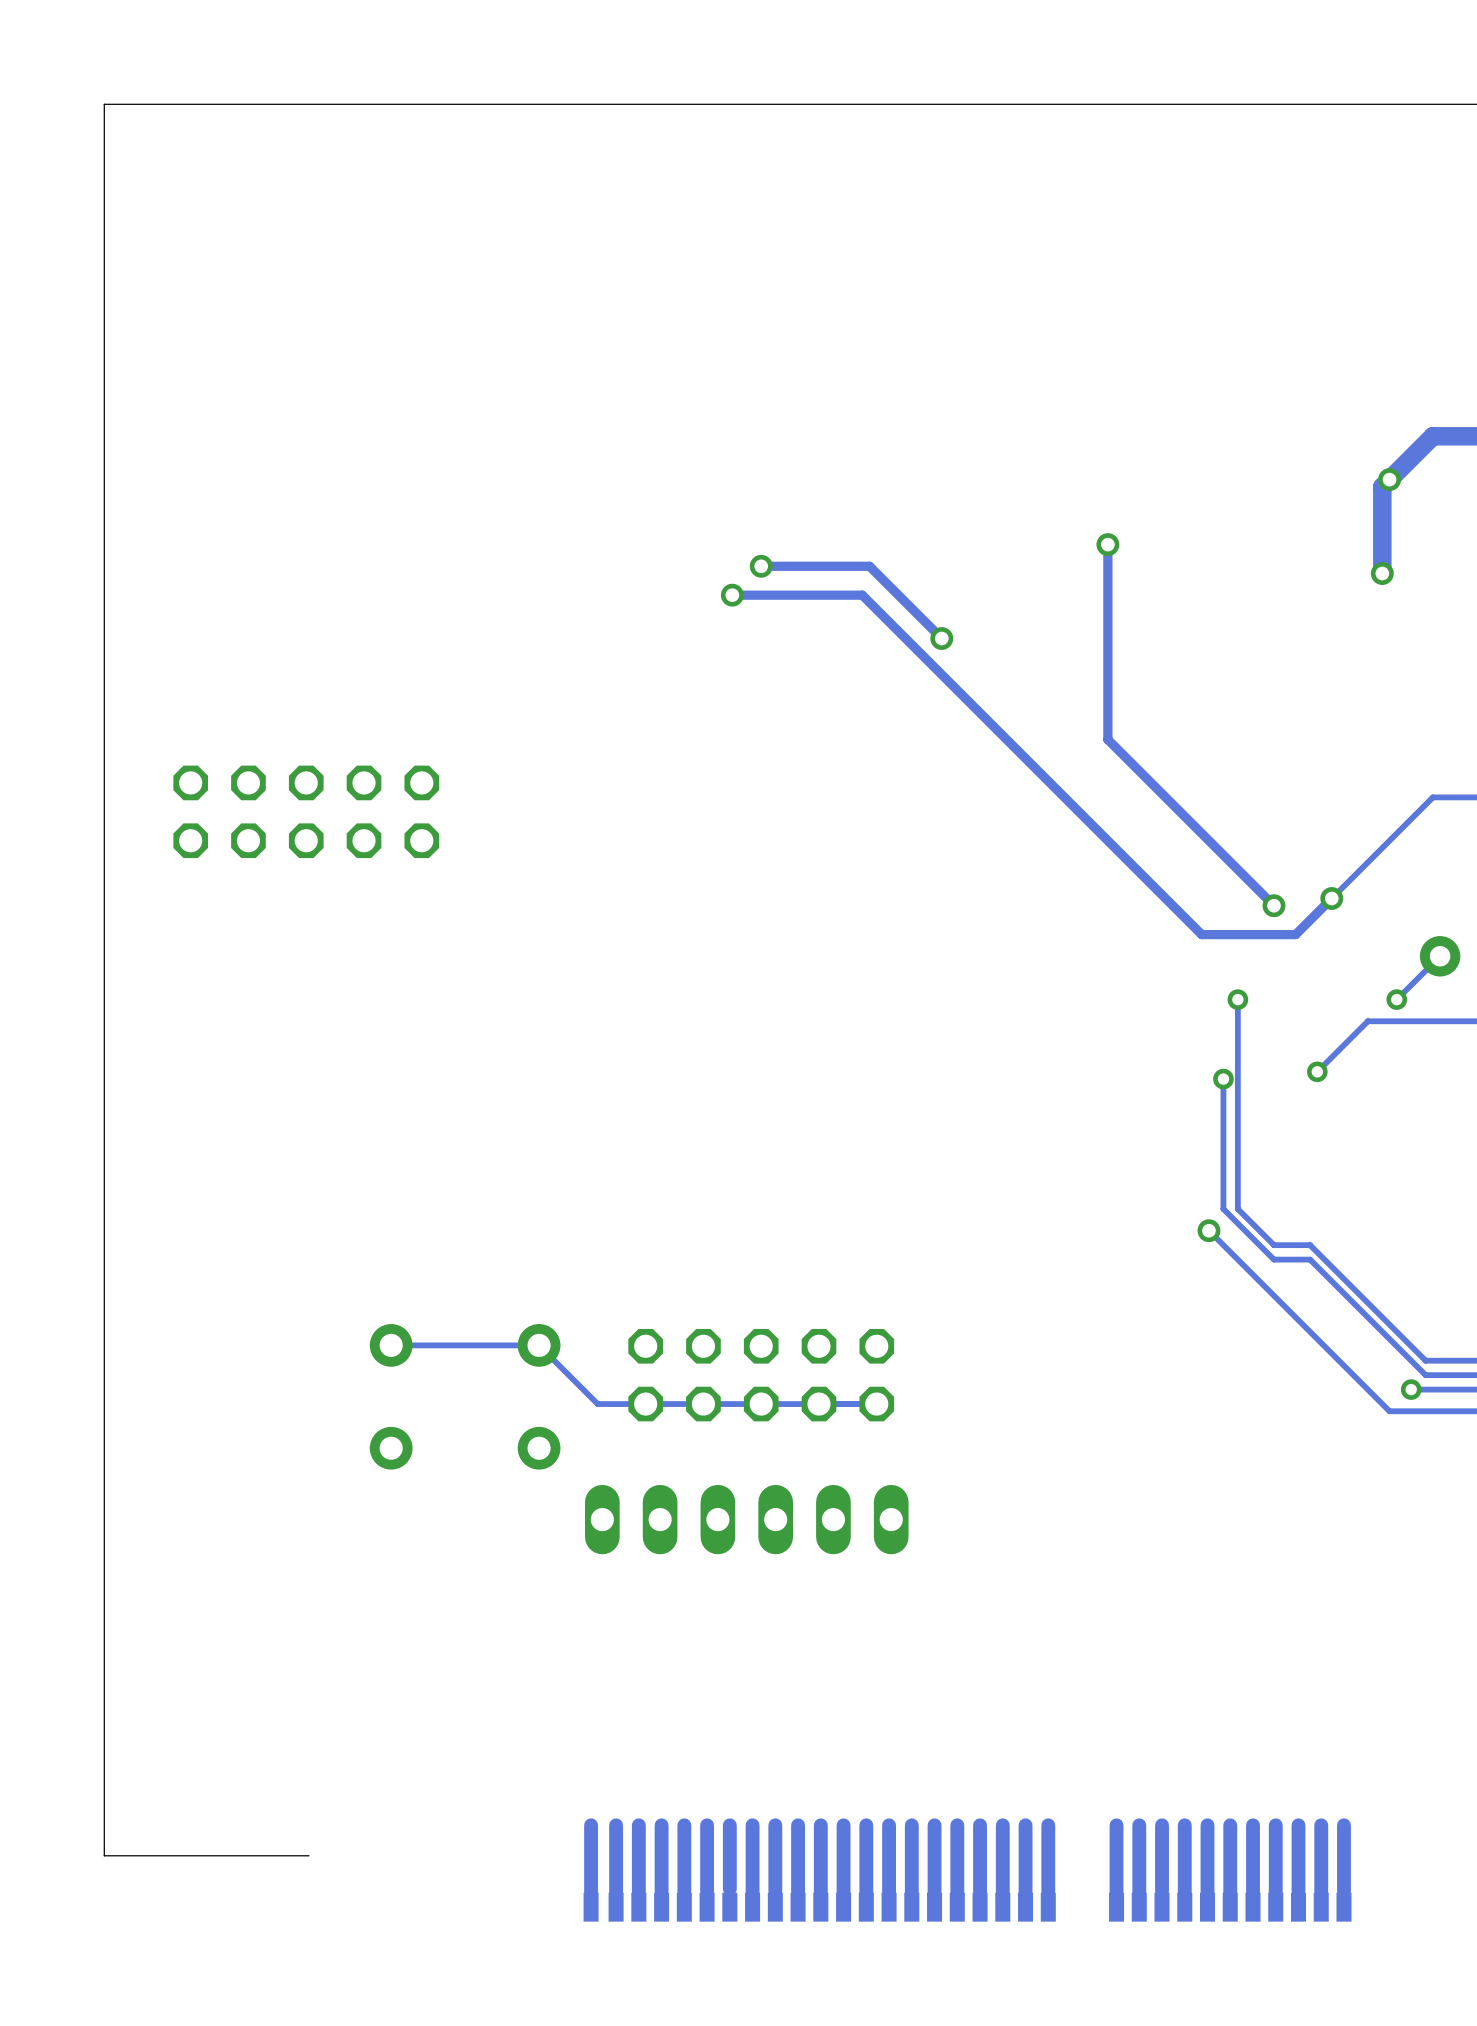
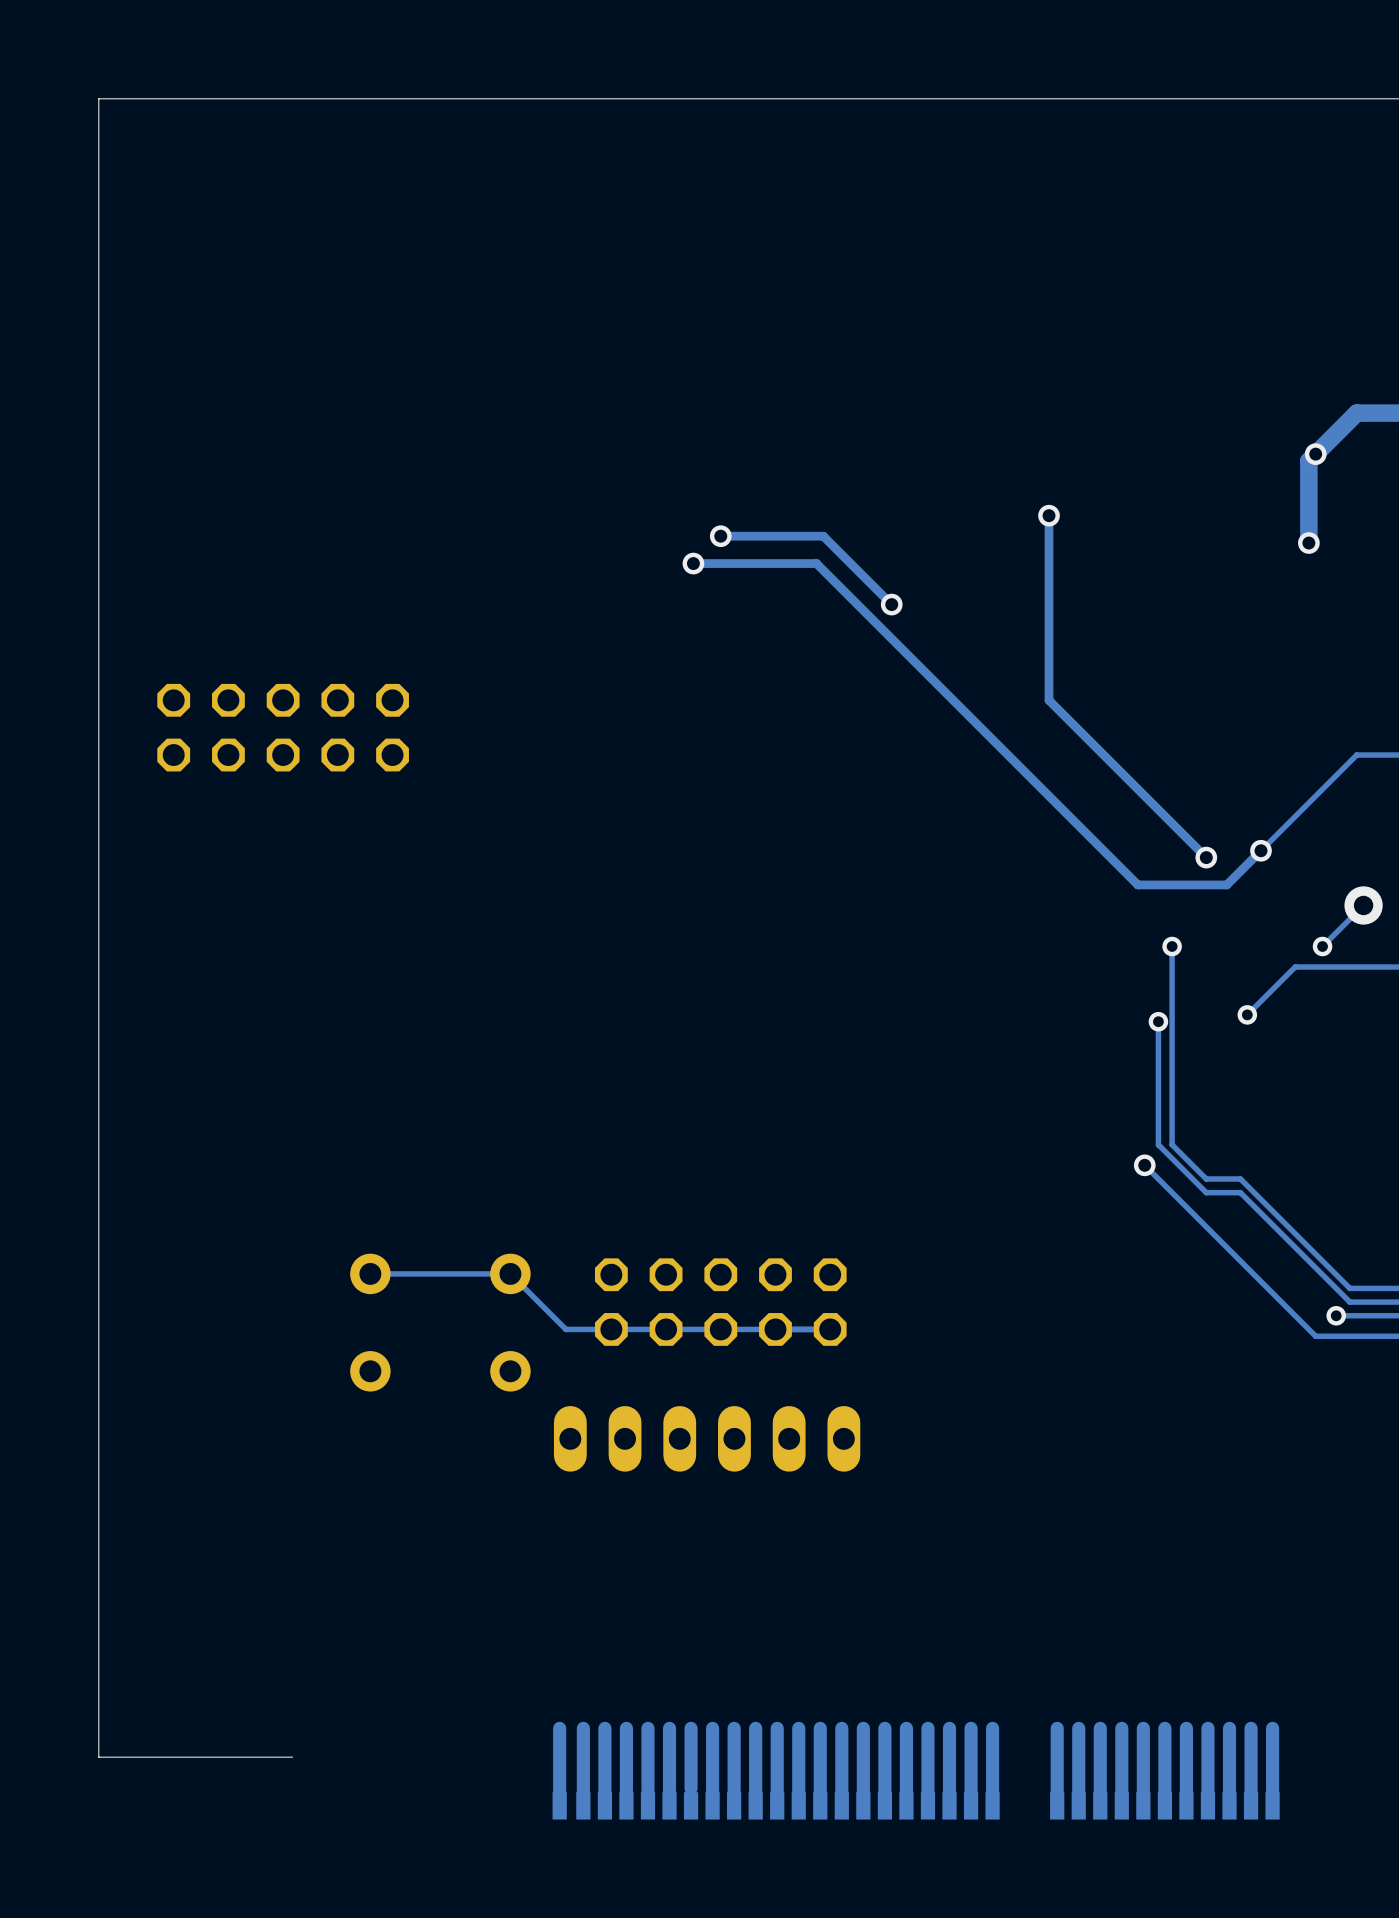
part position: (306, 811) -> (283, 727)

